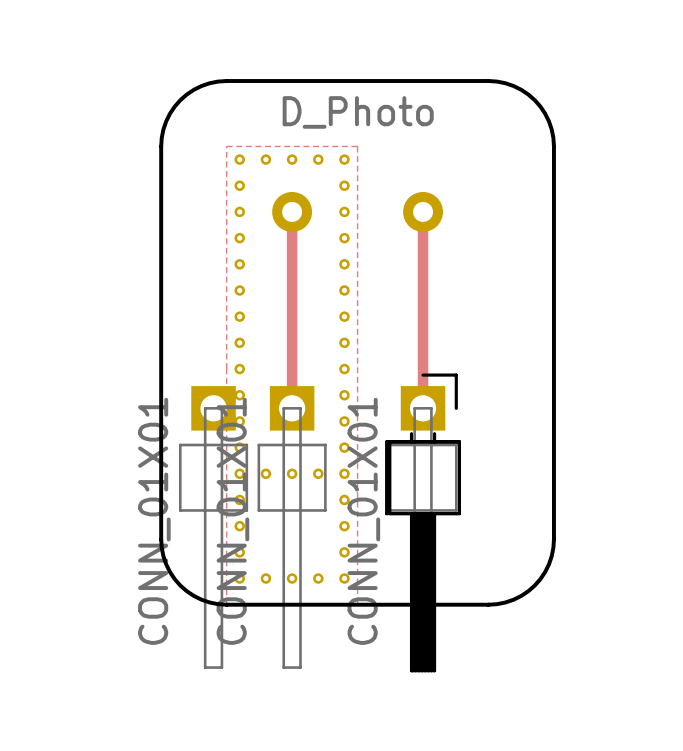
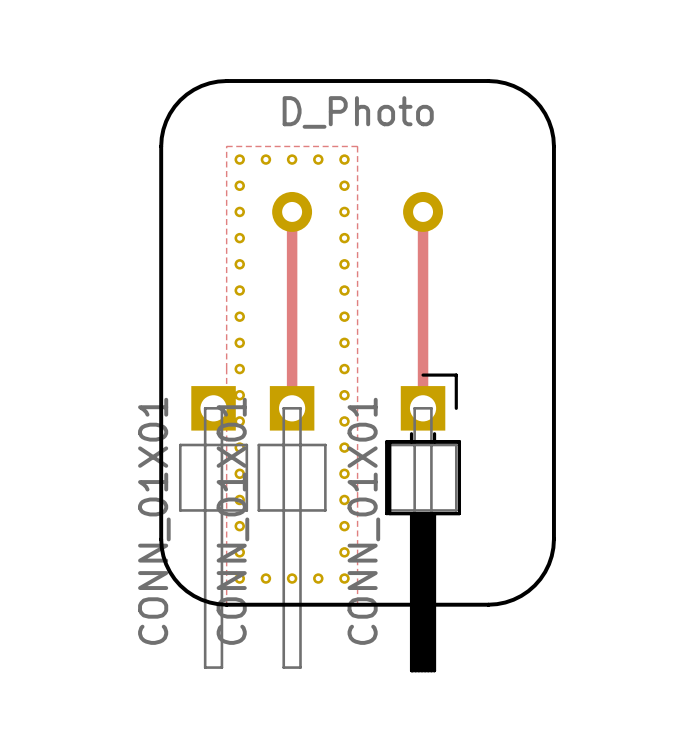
part: (265, 473) -> none
part: (292, 473) -> none
part: (318, 473) -> none

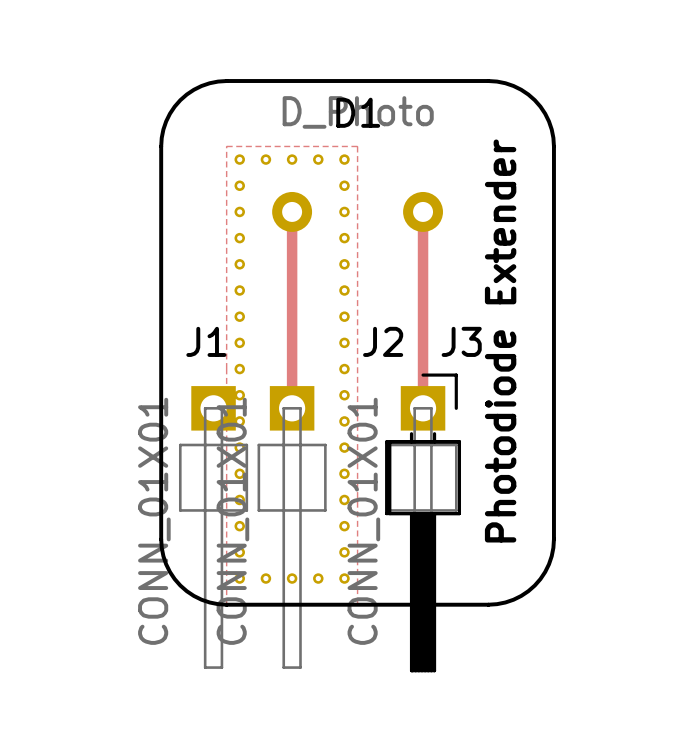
D1 name: none -> D1 (358, 112)
text: none -> Photodiode Extender (500, 340)
J1 name: none -> J1 (206, 341)
J2 name: none -> J2 (383, 341)
J3 name: none -> J3 (461, 341)

